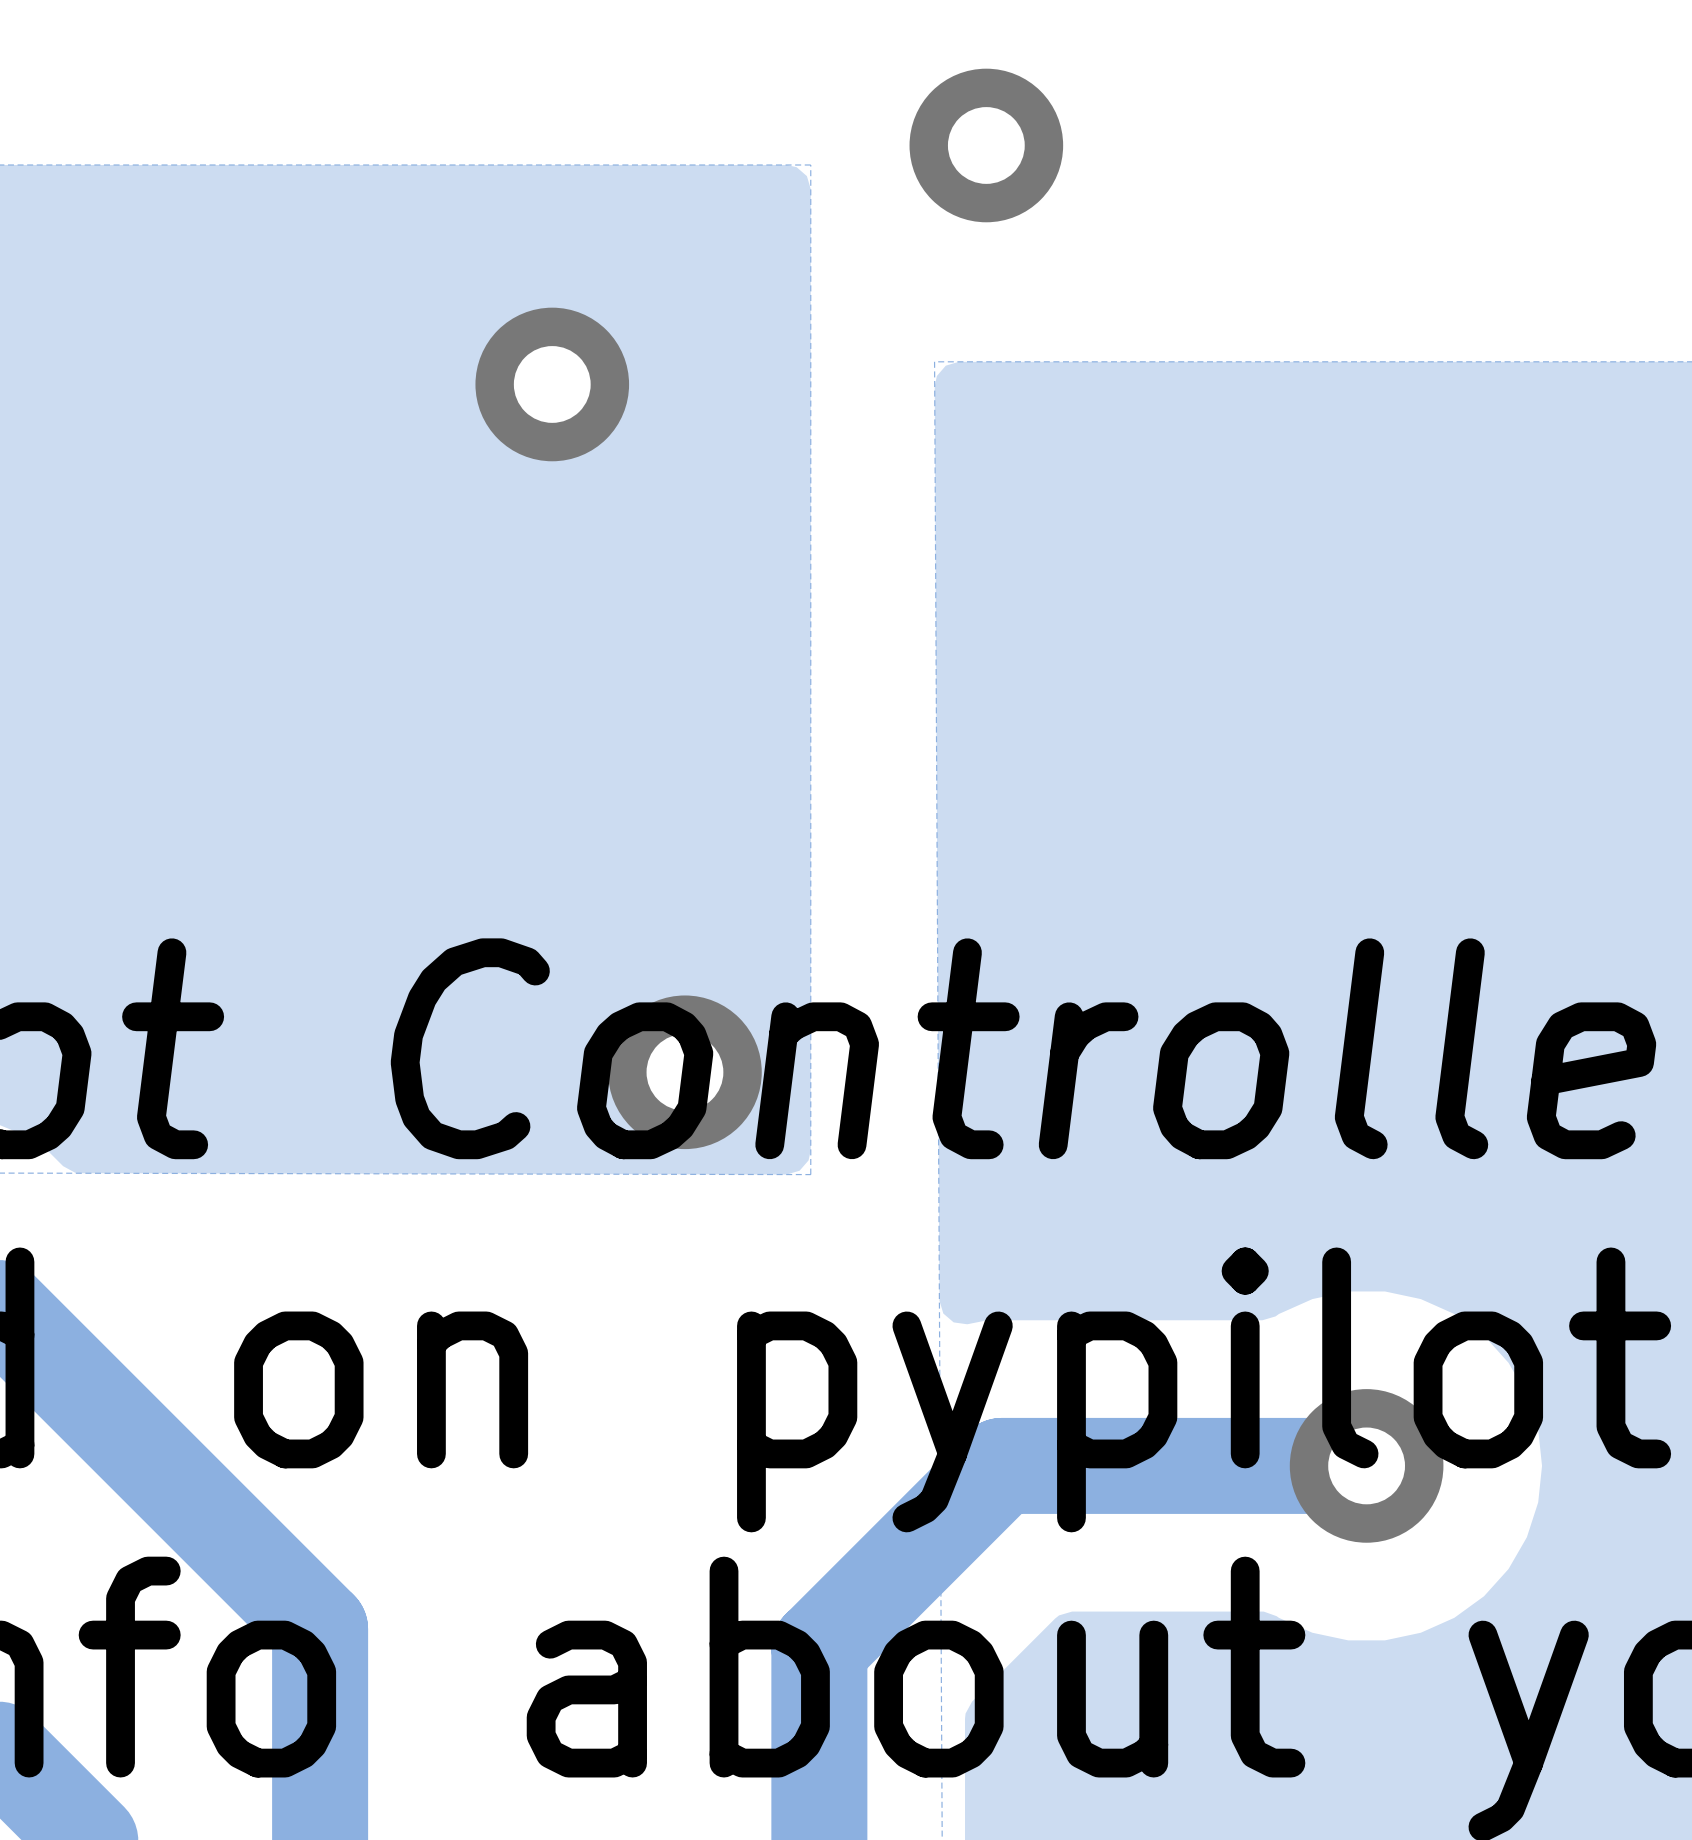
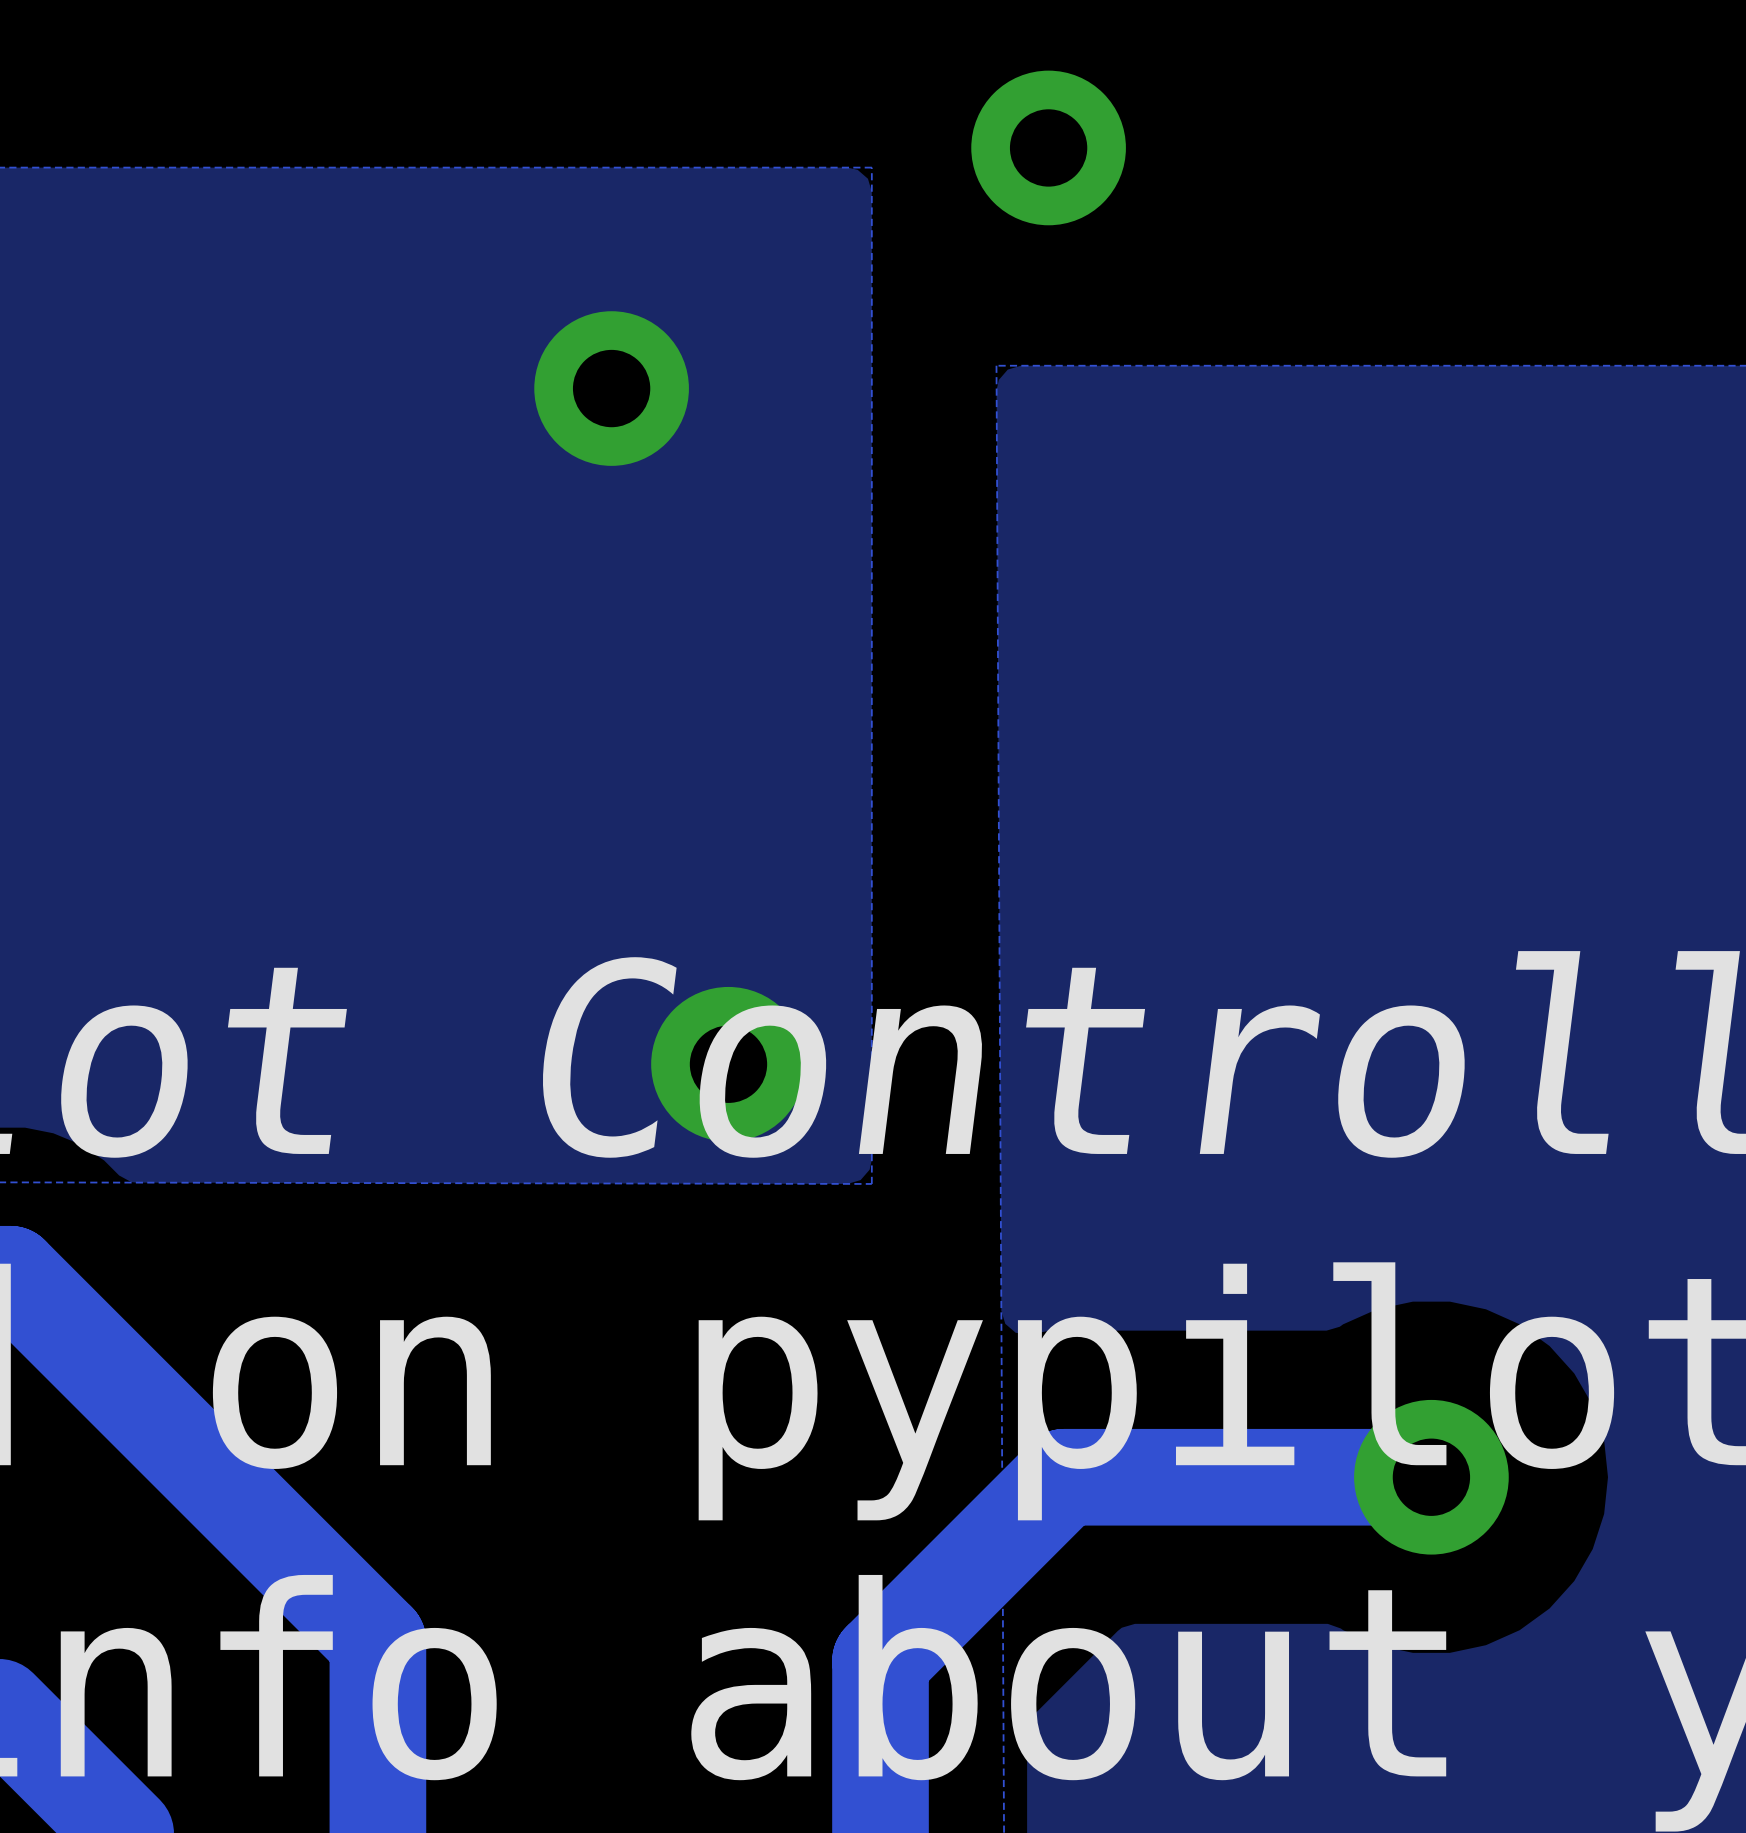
via position: (684, 1072) -> (728, 1064)

